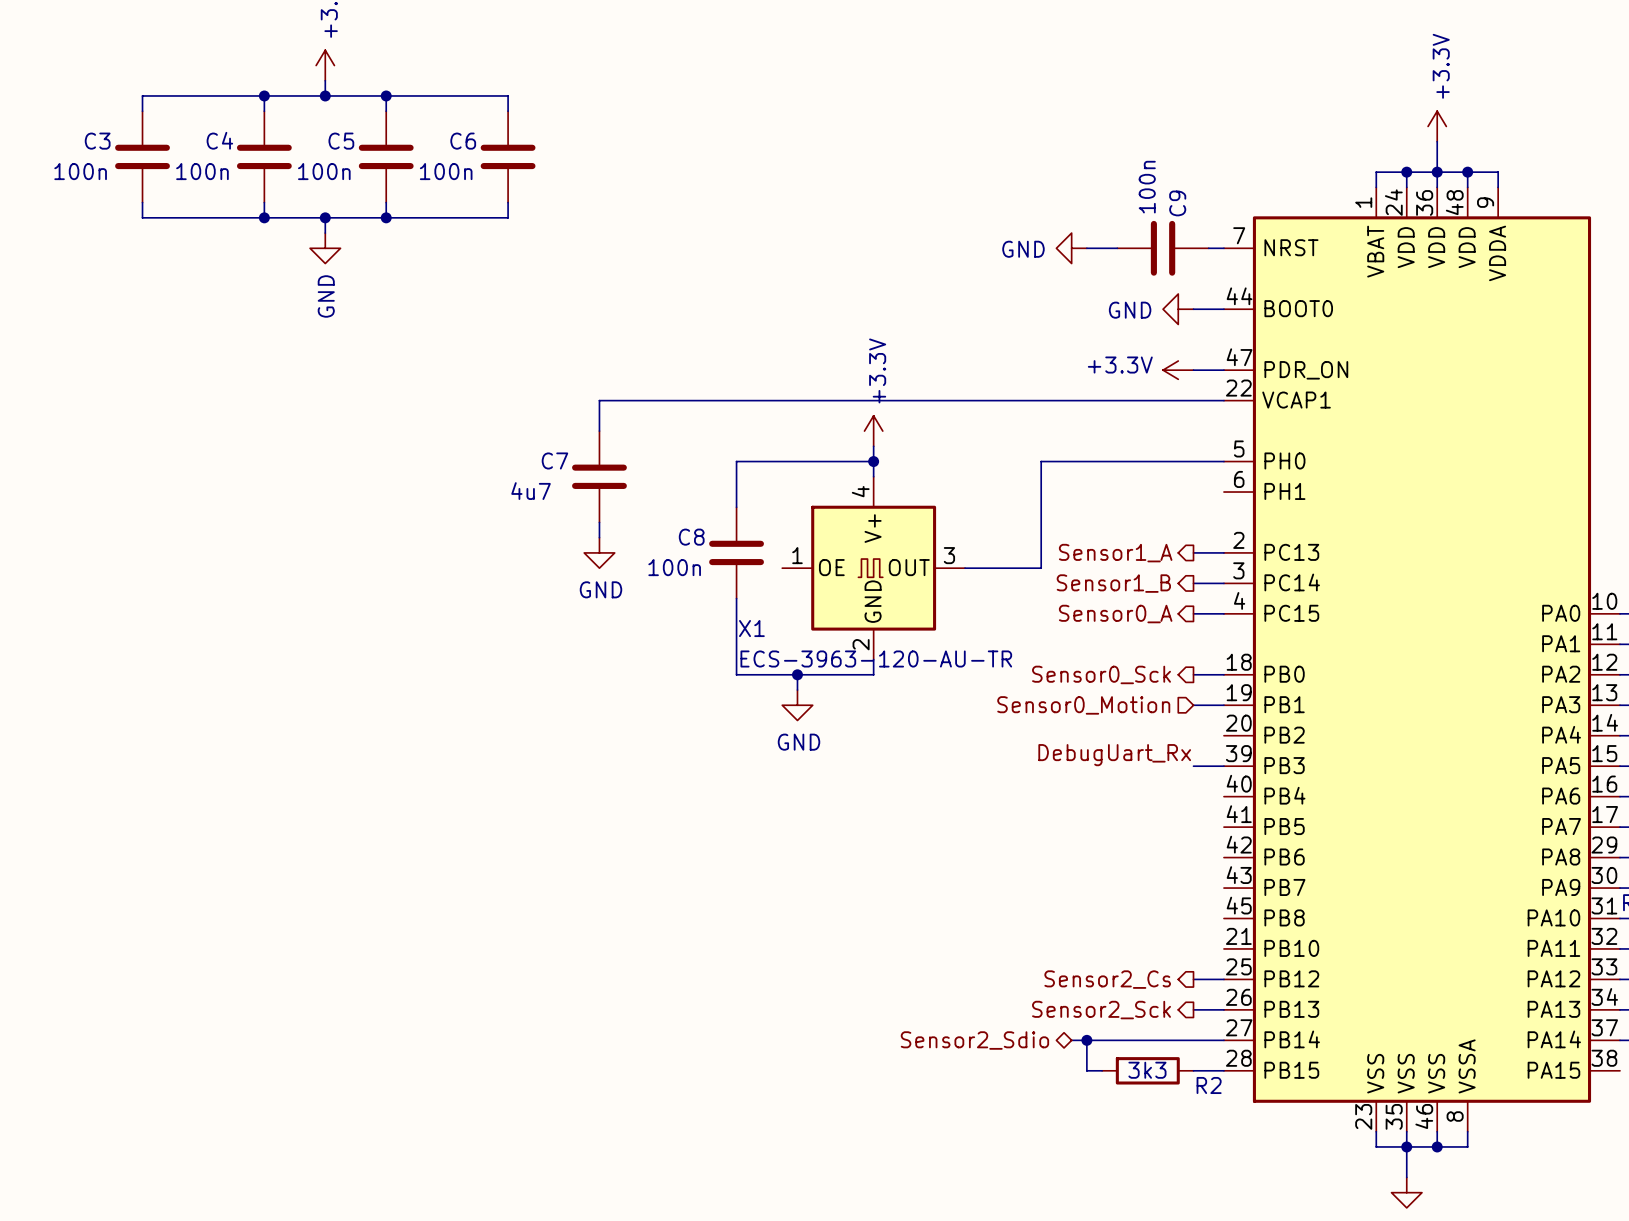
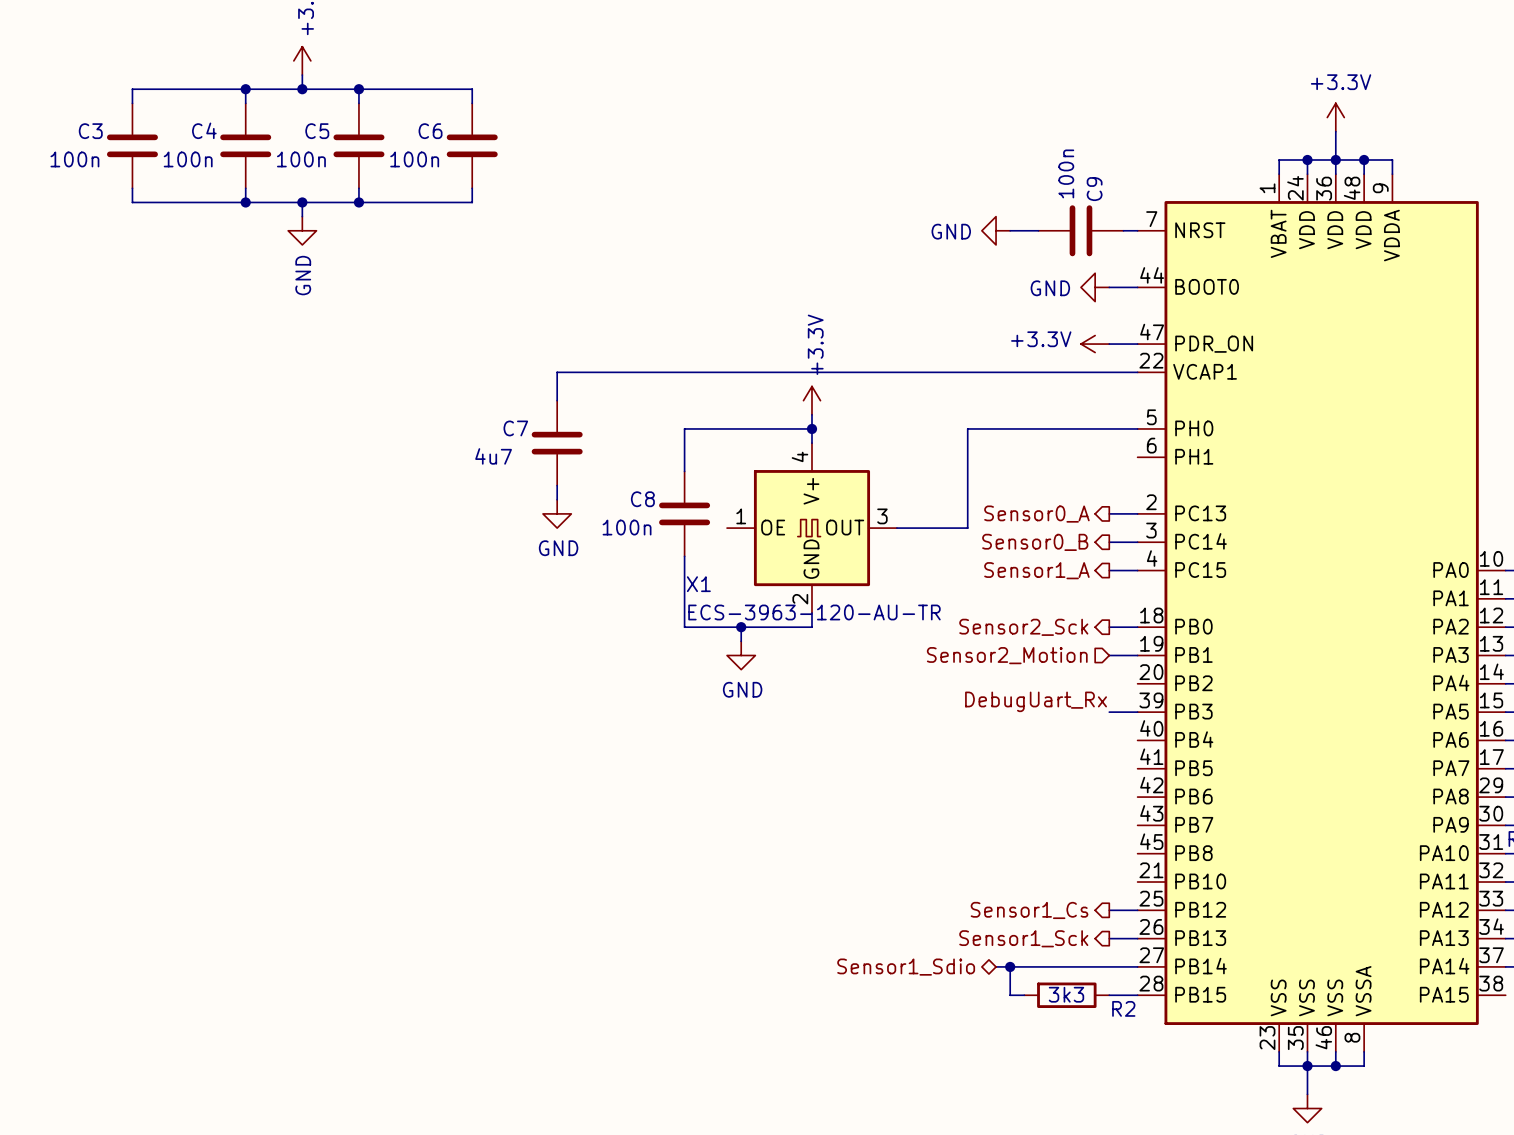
power symbol text rotation: 0° (1441, 66) -> 90° clockwise (1341, 82)
hierarchical label: Sensor1_A (1115, 553) -> Sensor0_A (1036, 514)
hierarchical label: Sensor1_B (1113, 583) -> Sensor0_B (1035, 542)
hierarchical label: Sensor0_A (1115, 614) -> Sensor1_A (1036, 570)
hierarchical label: Sensor0_Sck (1101, 674) -> Sensor2_Sck (1023, 627)
hierarchical label: Sensor0_Motion (1083, 705) -> Sensor2_Motion (1007, 655)
hierarchical label: Sensor2_Cs (1107, 979) -> Sensor1_Cs (1029, 910)
hierarchical label: Sensor2_Sck (1101, 1010) -> Sensor1_Sck (1023, 938)
hierarchical label: Sensor2_Sdio (974, 1040) -> Sensor1_Sdio (906, 967)

